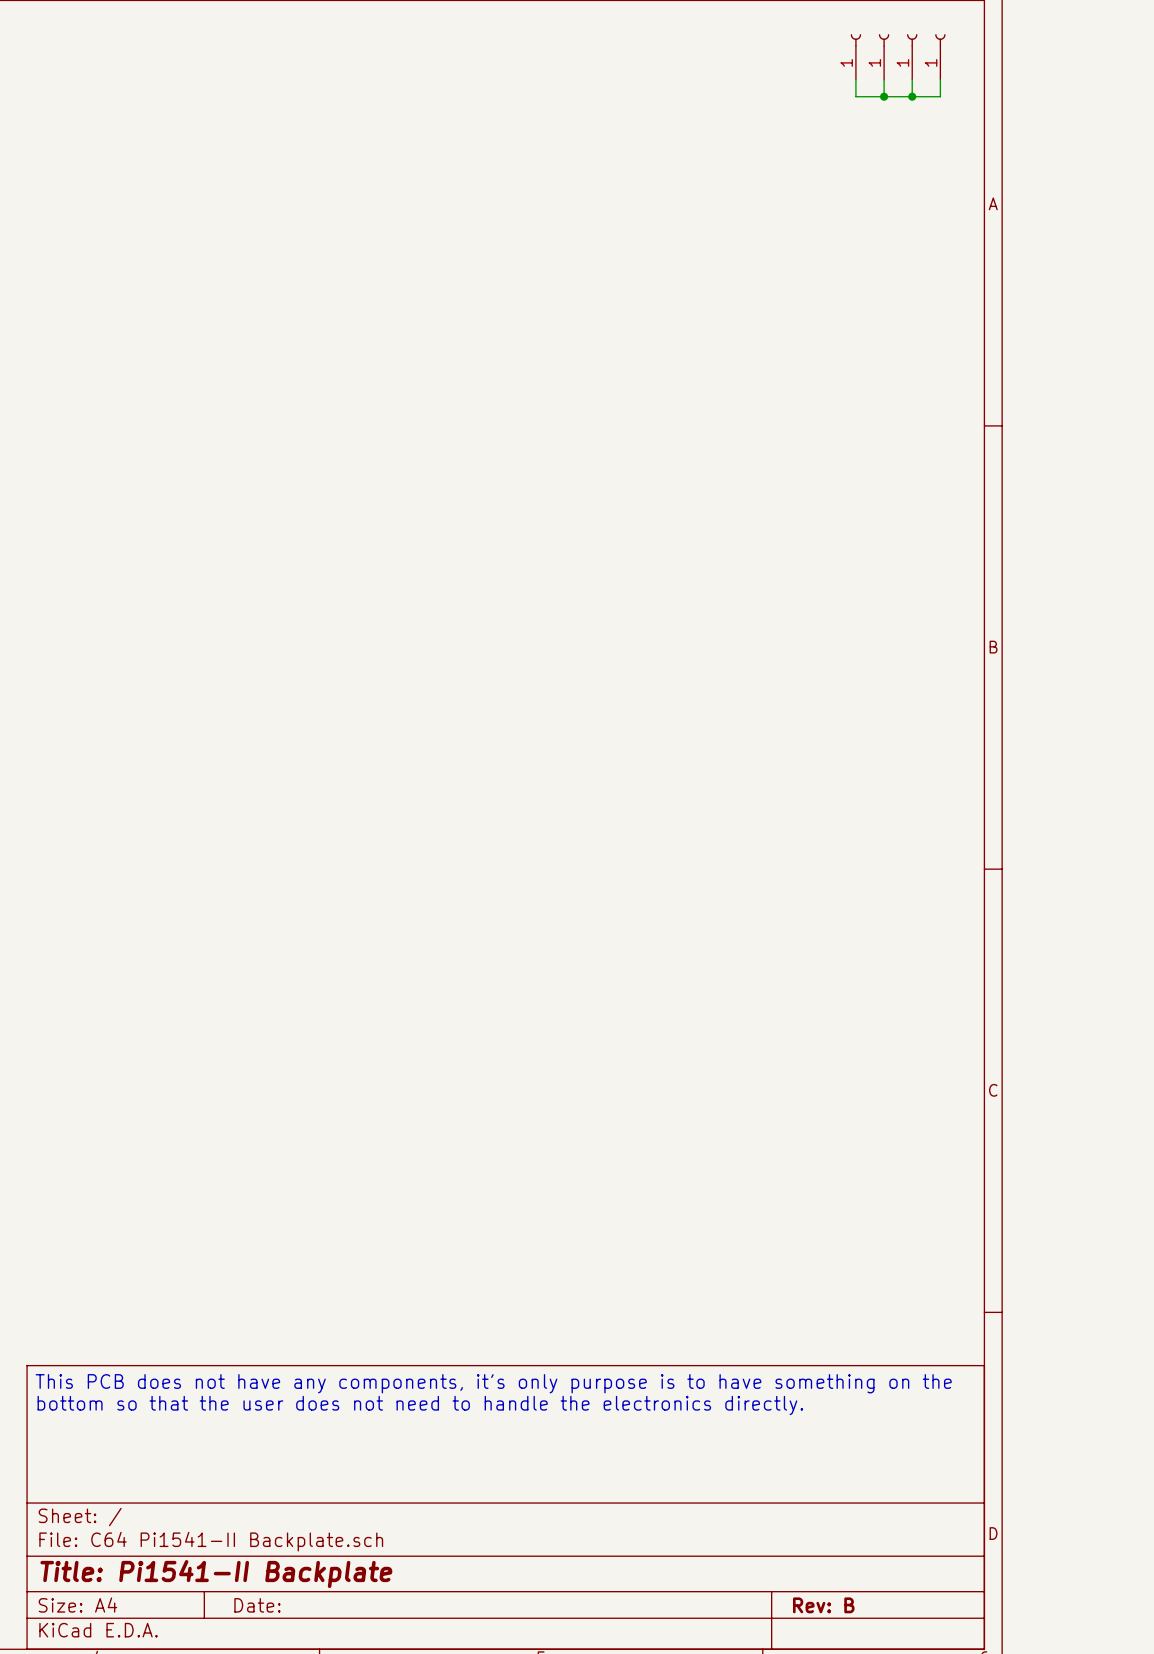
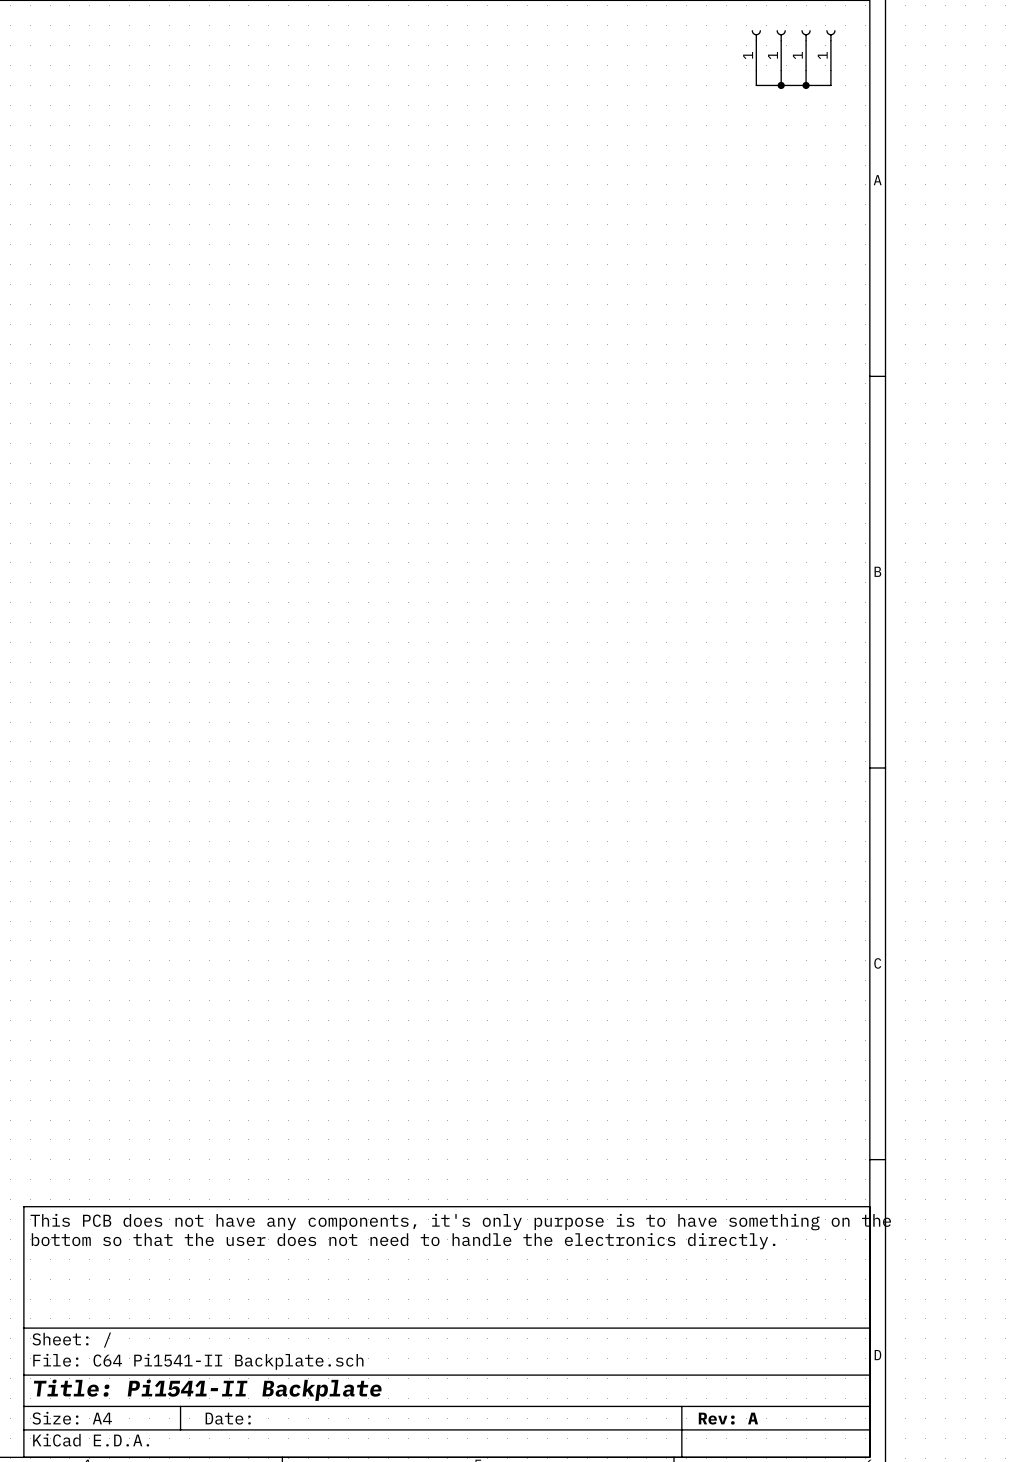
title block: Rev: B (823, 1605) -> Rev: A (728, 1418)

